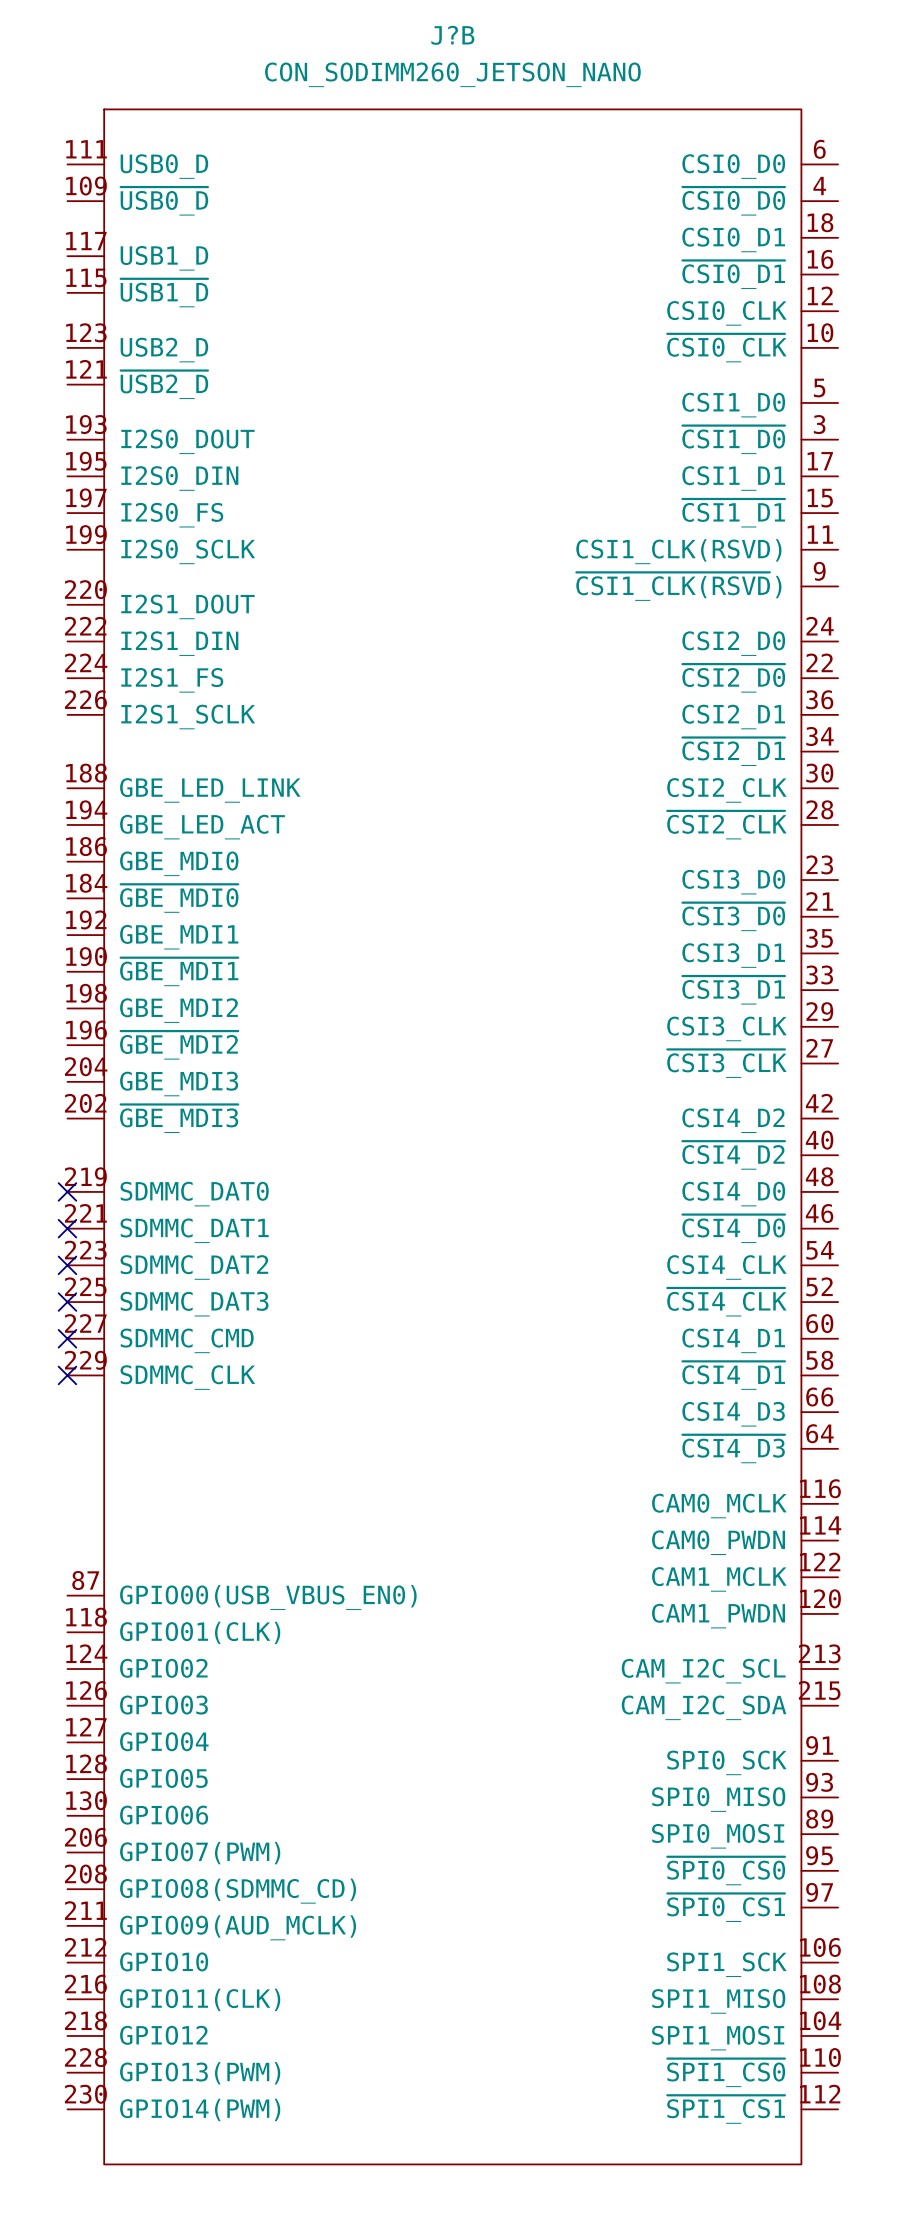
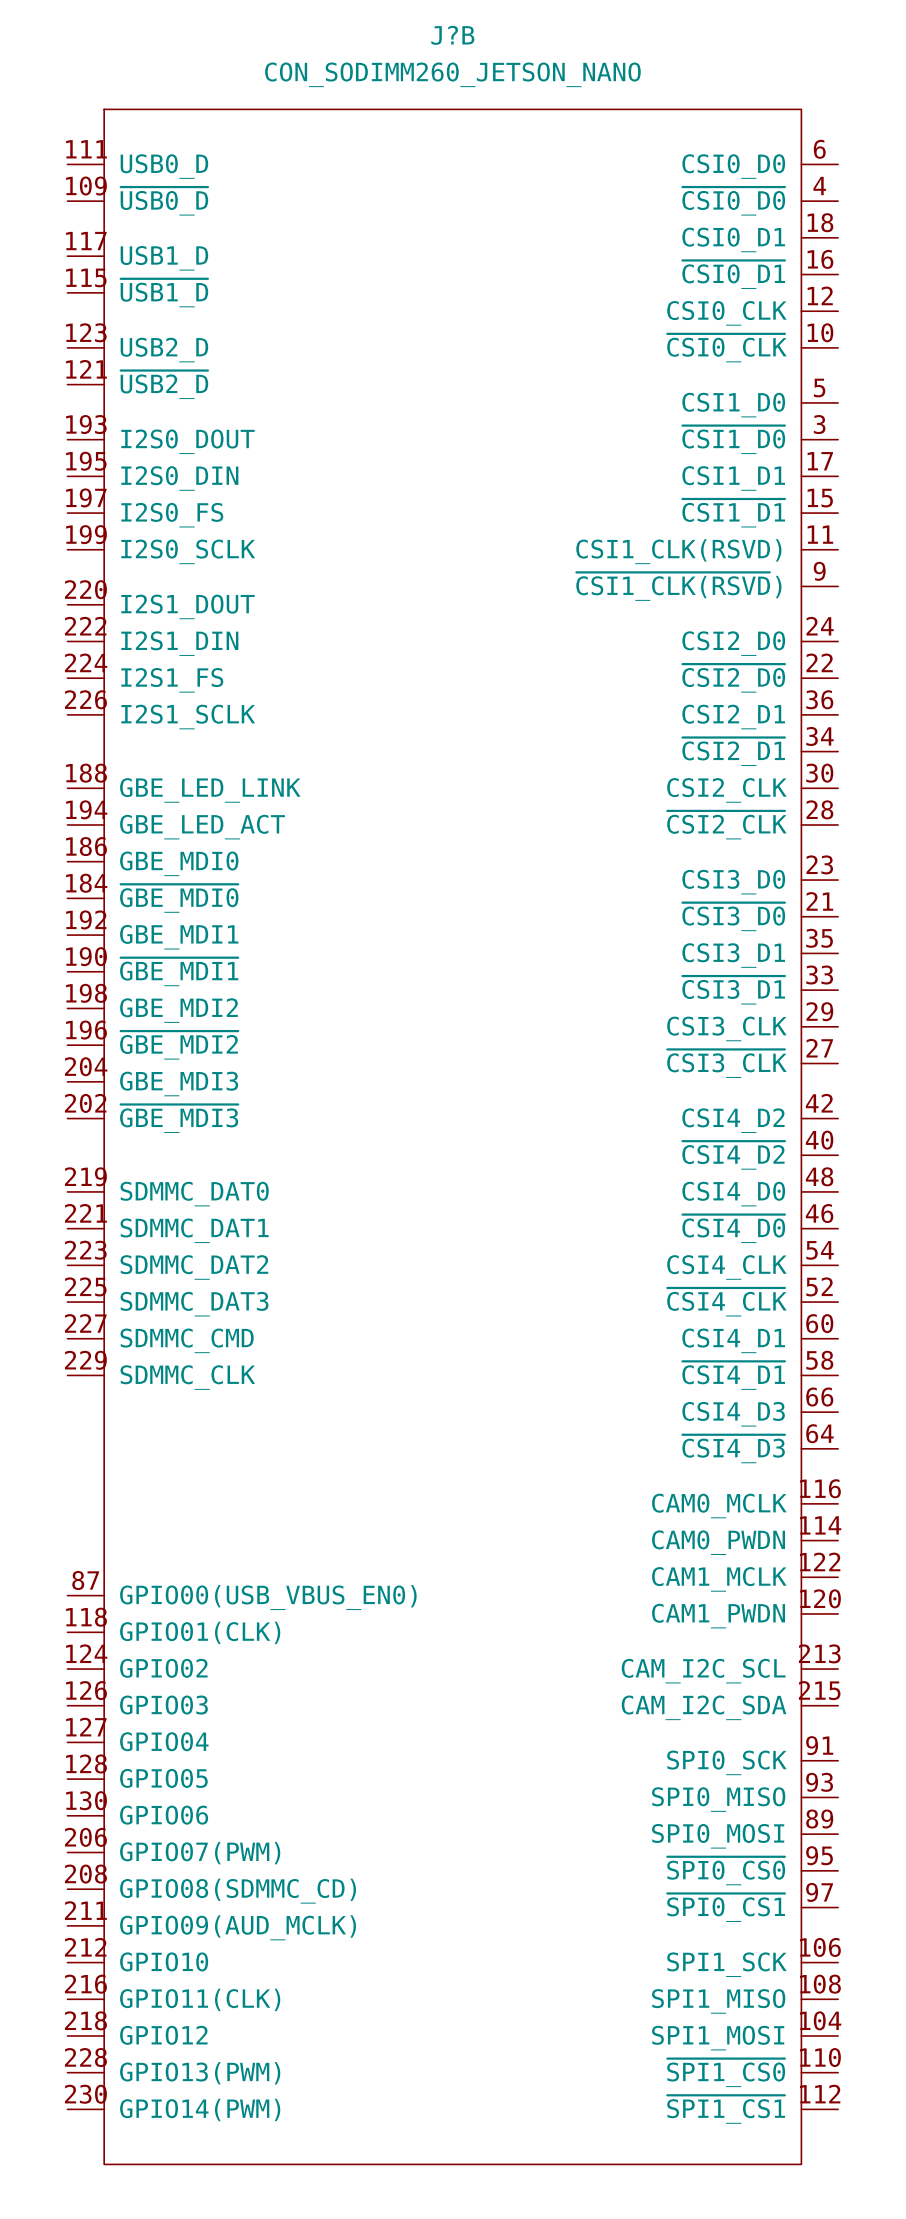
no-connect mark: (67, 1191) -> none
no-connect mark: (67, 1228) -> none
no-connect mark: (67, 1265) -> none
no-connect mark: (67, 1302) -> none
no-connect mark: (67, 1338) -> none
no-connect mark: (67, 1375) -> none

